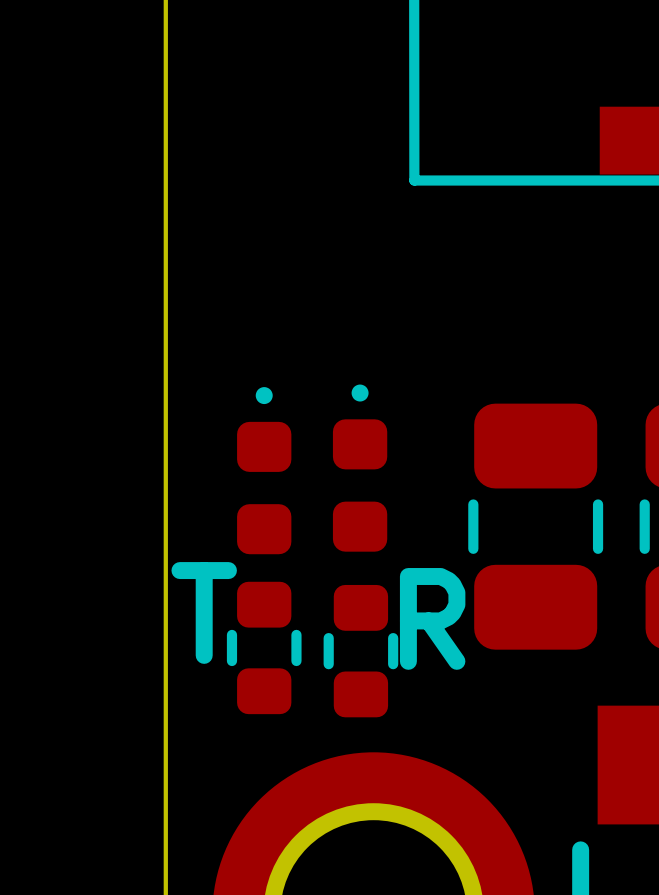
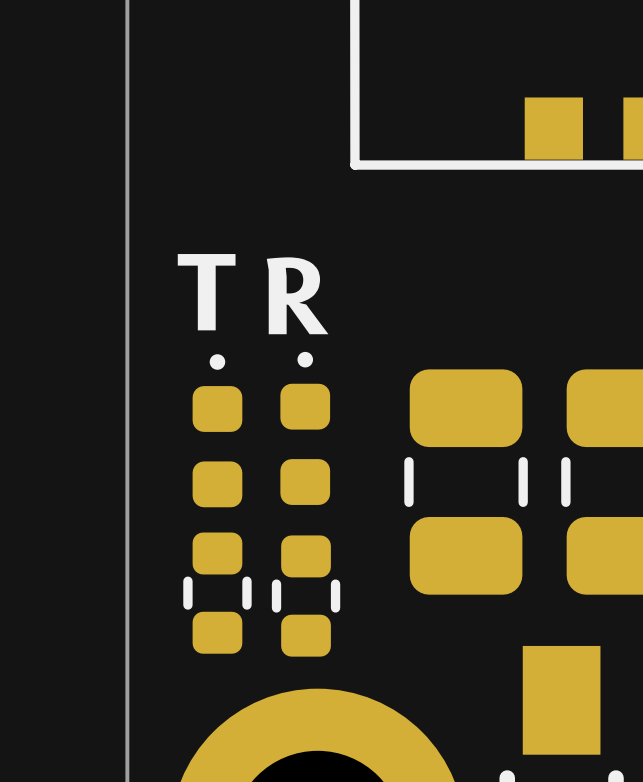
text position: T (204, 612) -> T (206, 292)
text position: R (432, 618) -> R (297, 295)

